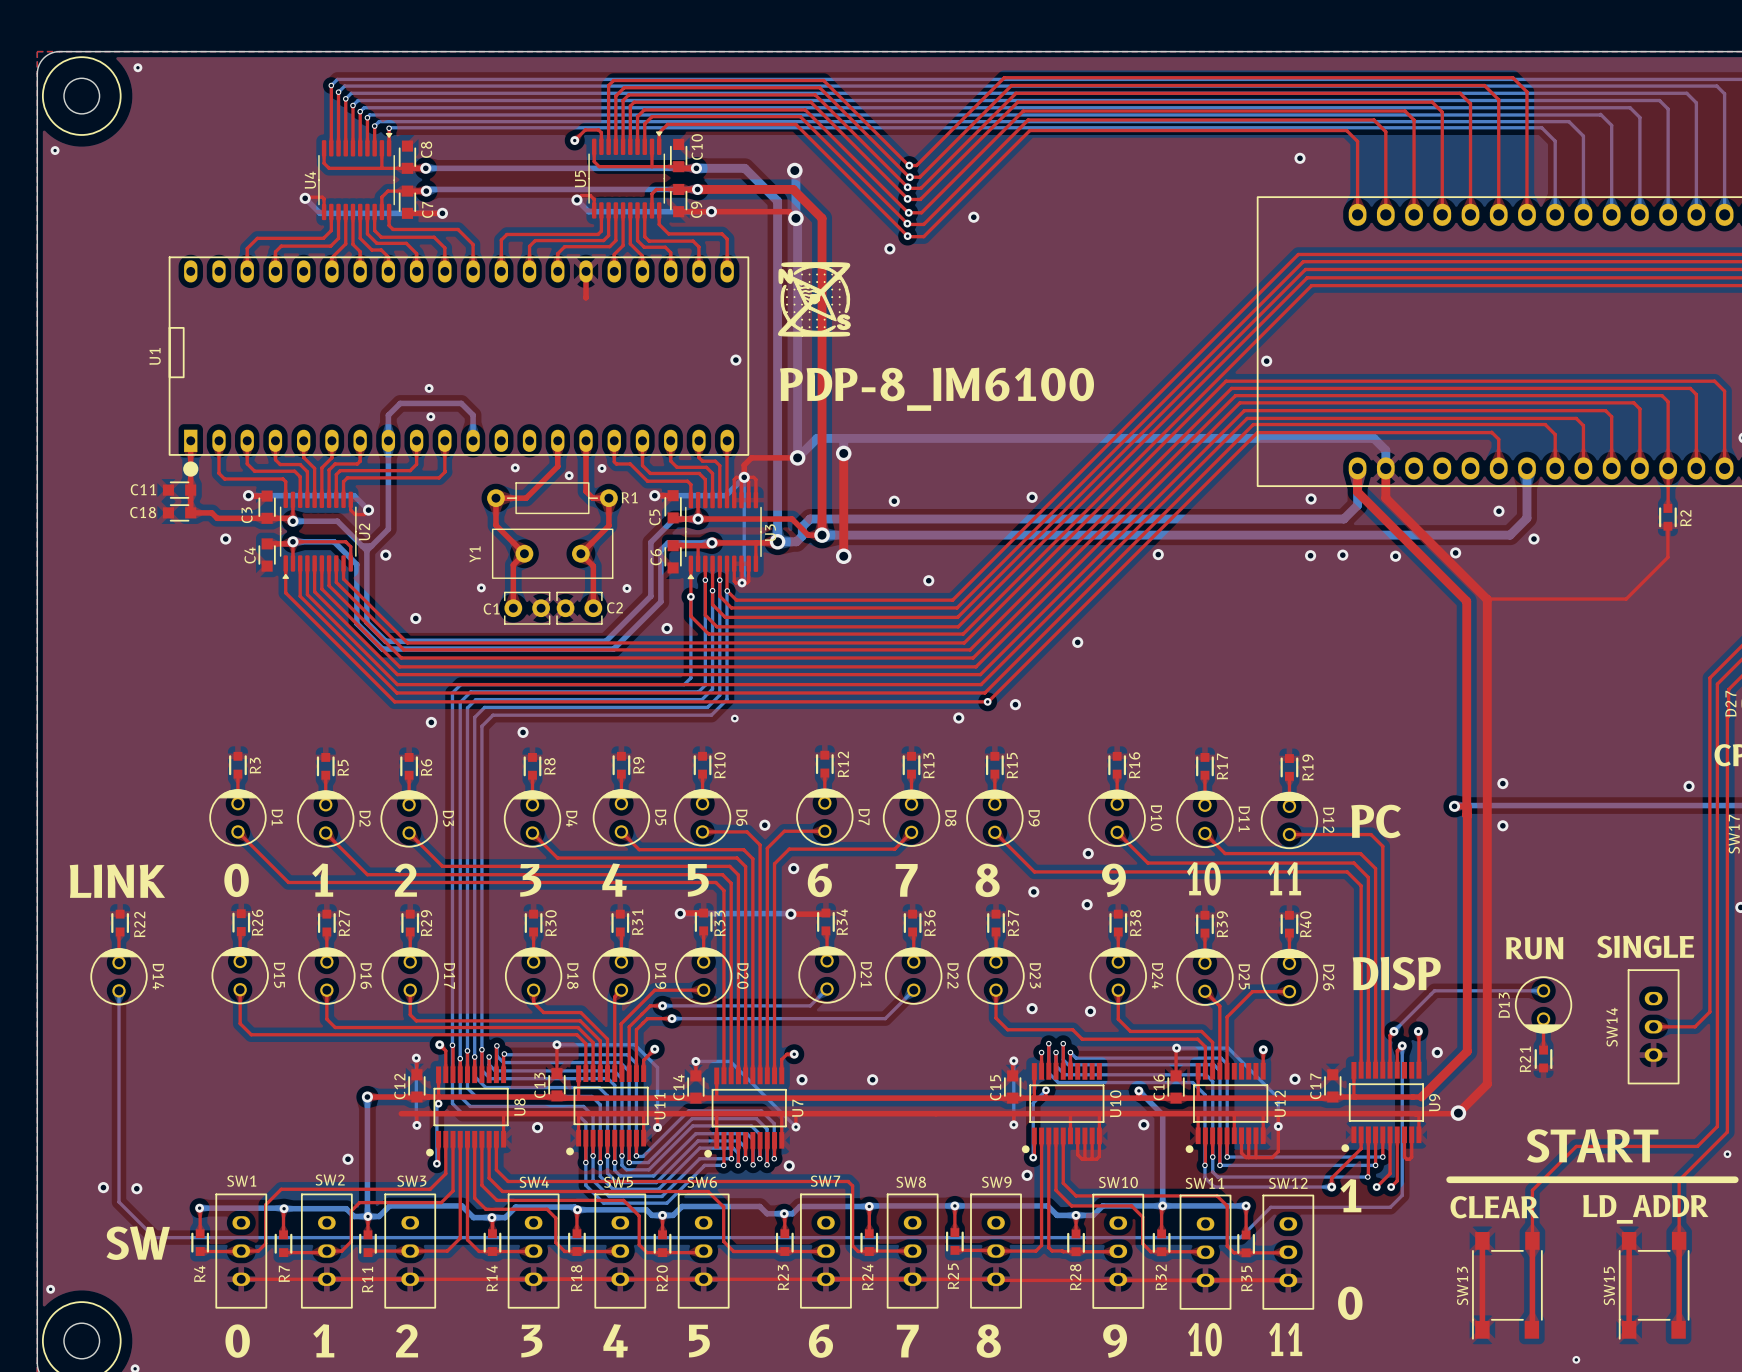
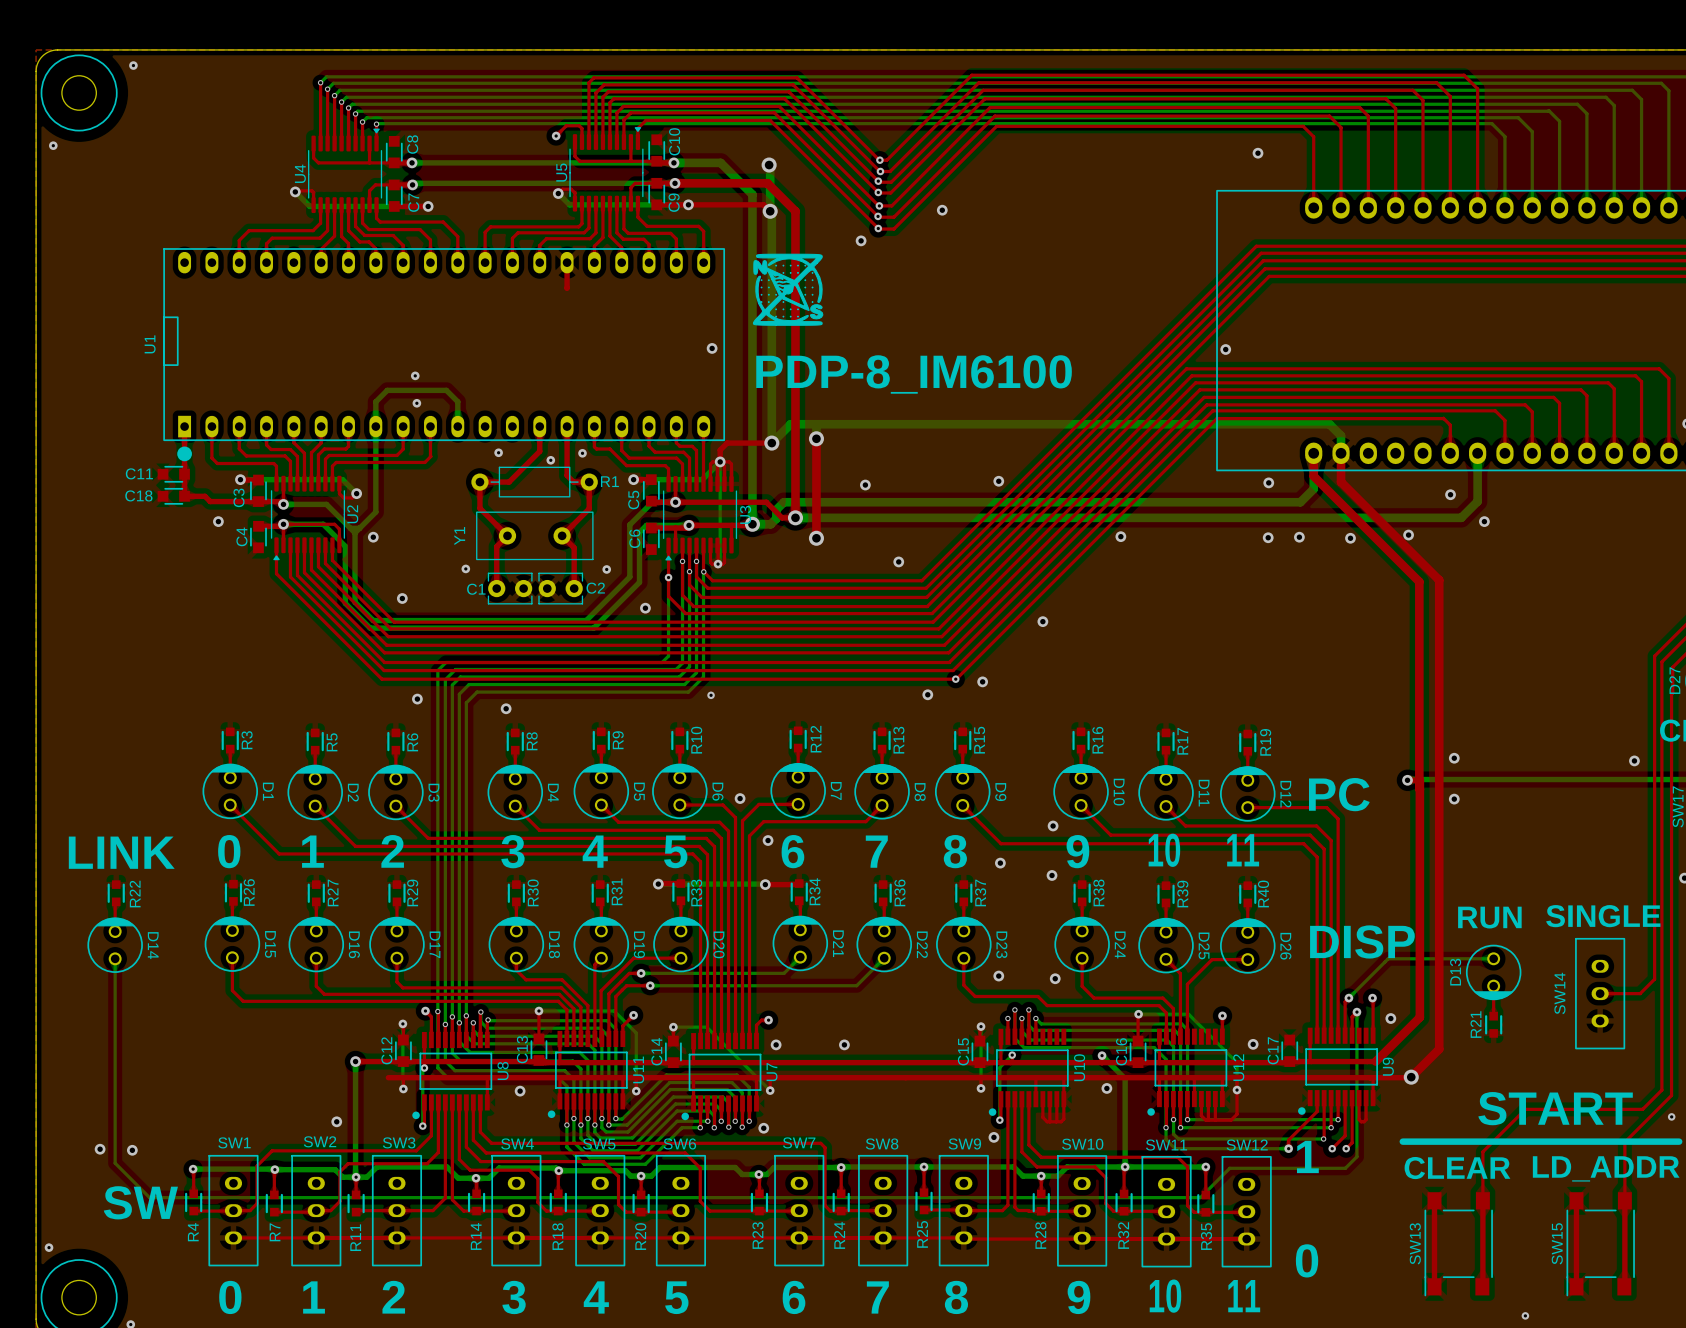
top track: (1668, 468) (1667, 508) -> none
R2: (1667, 517) -> none
top track: (1667, 526) (1667, 557) (1626, 599) (1486, 599) -> none

